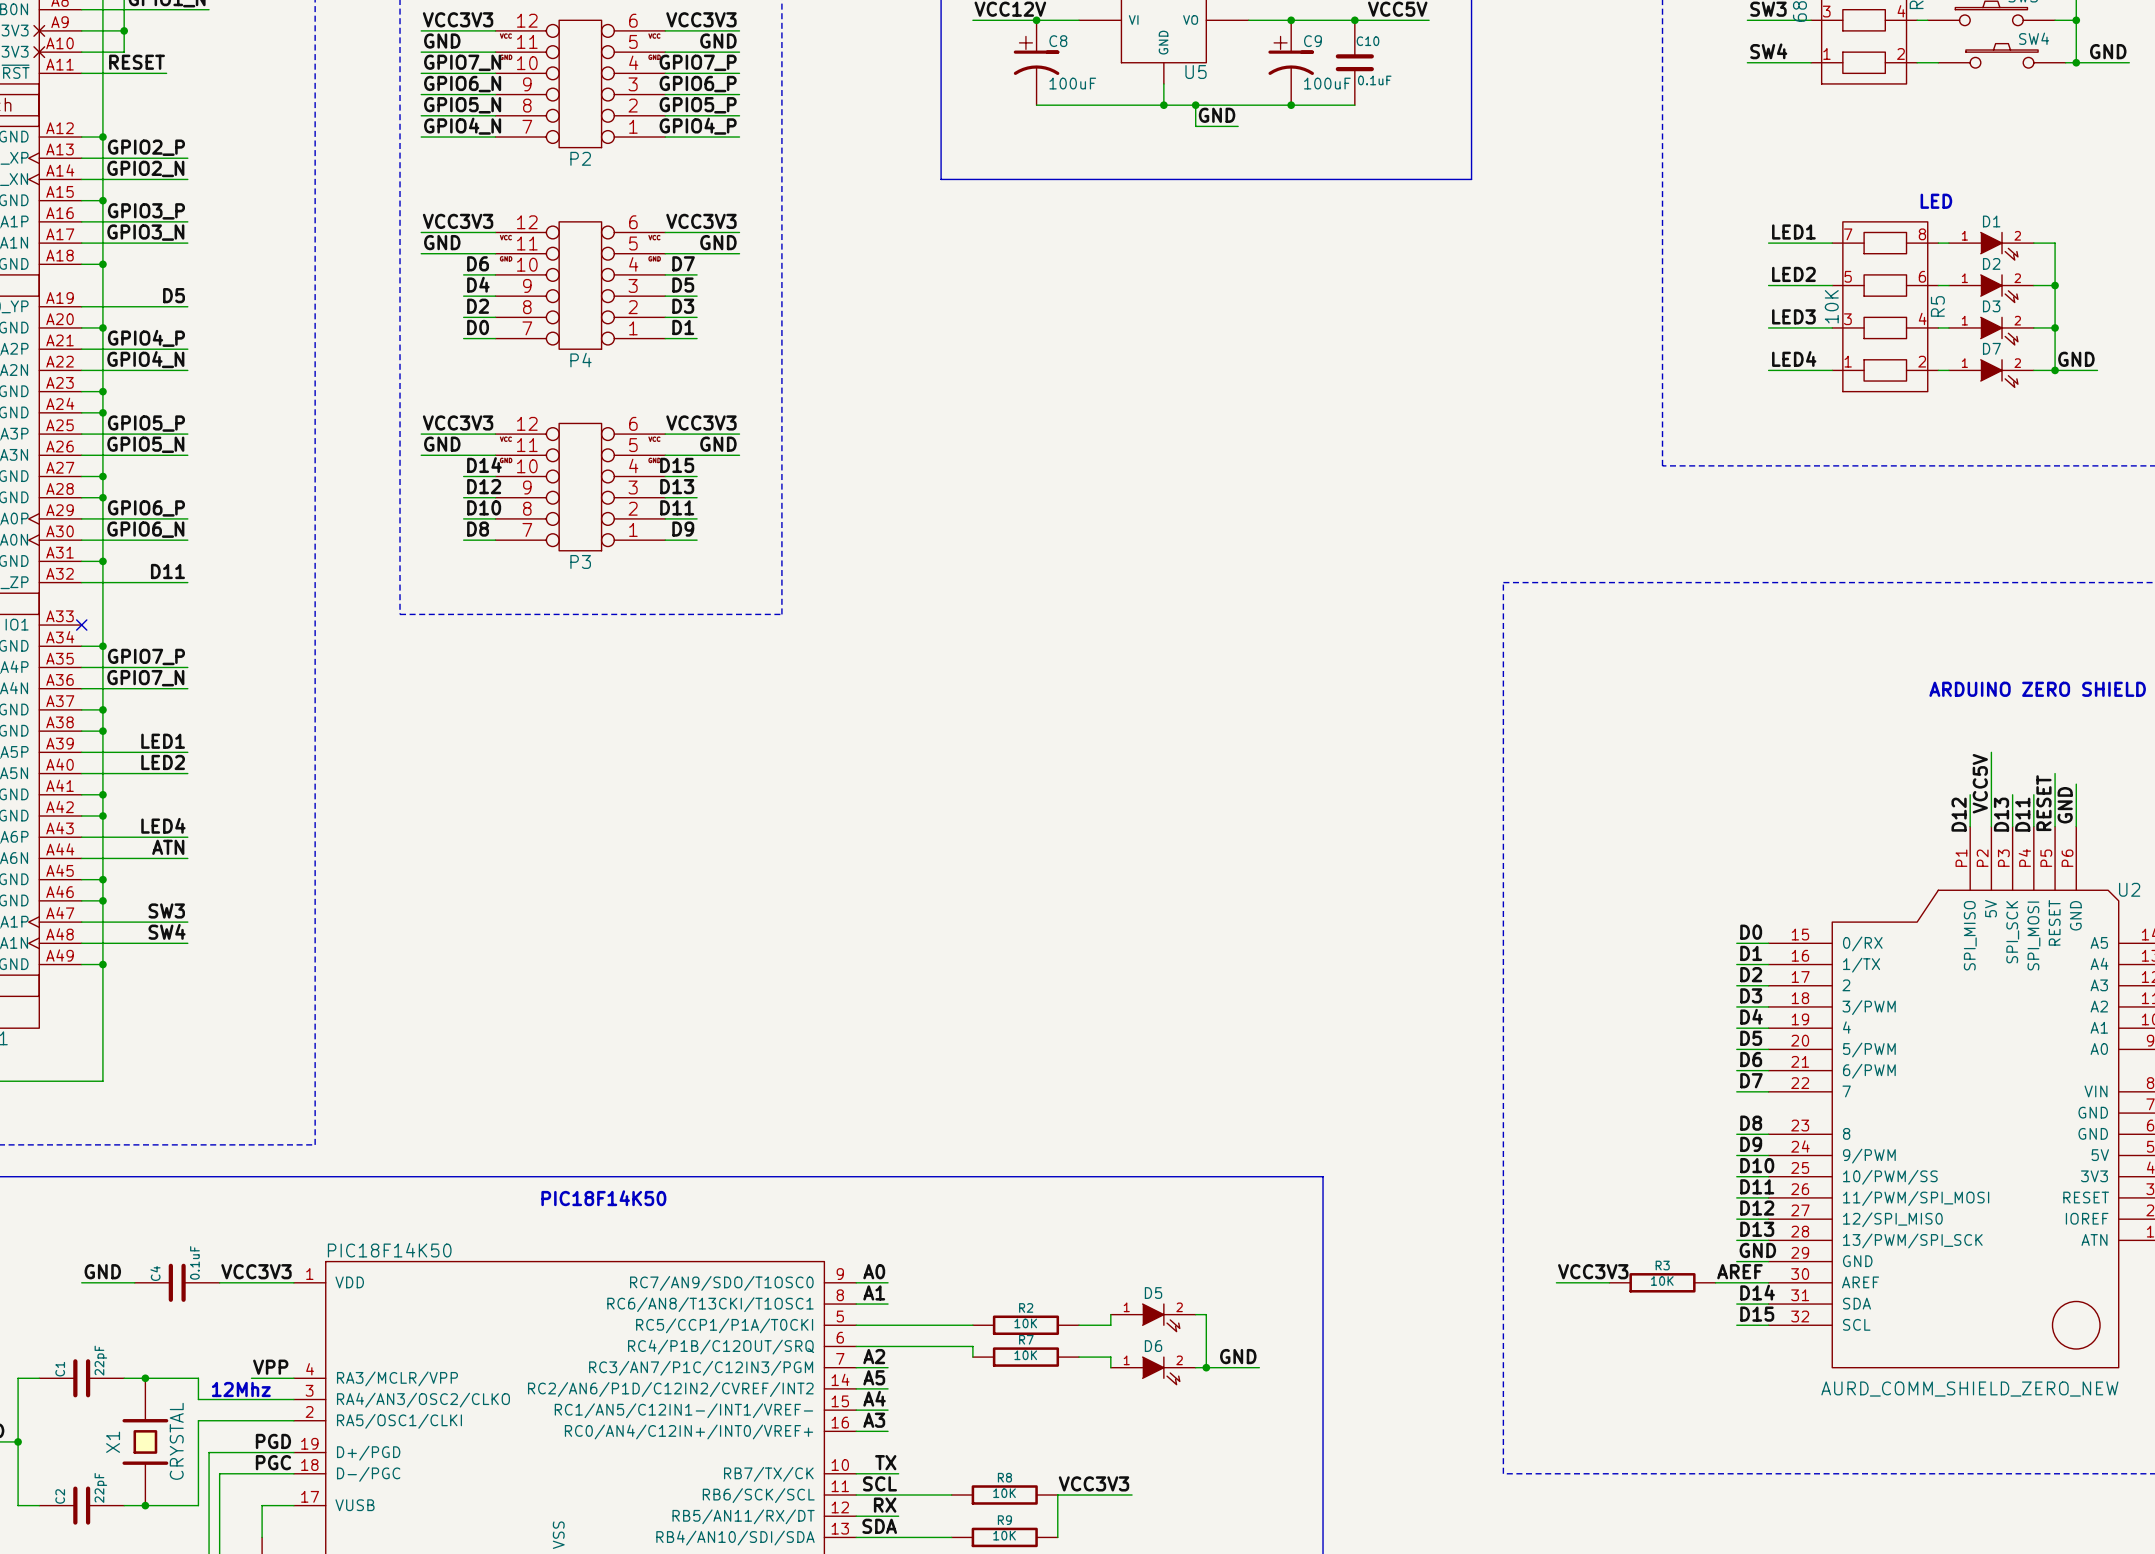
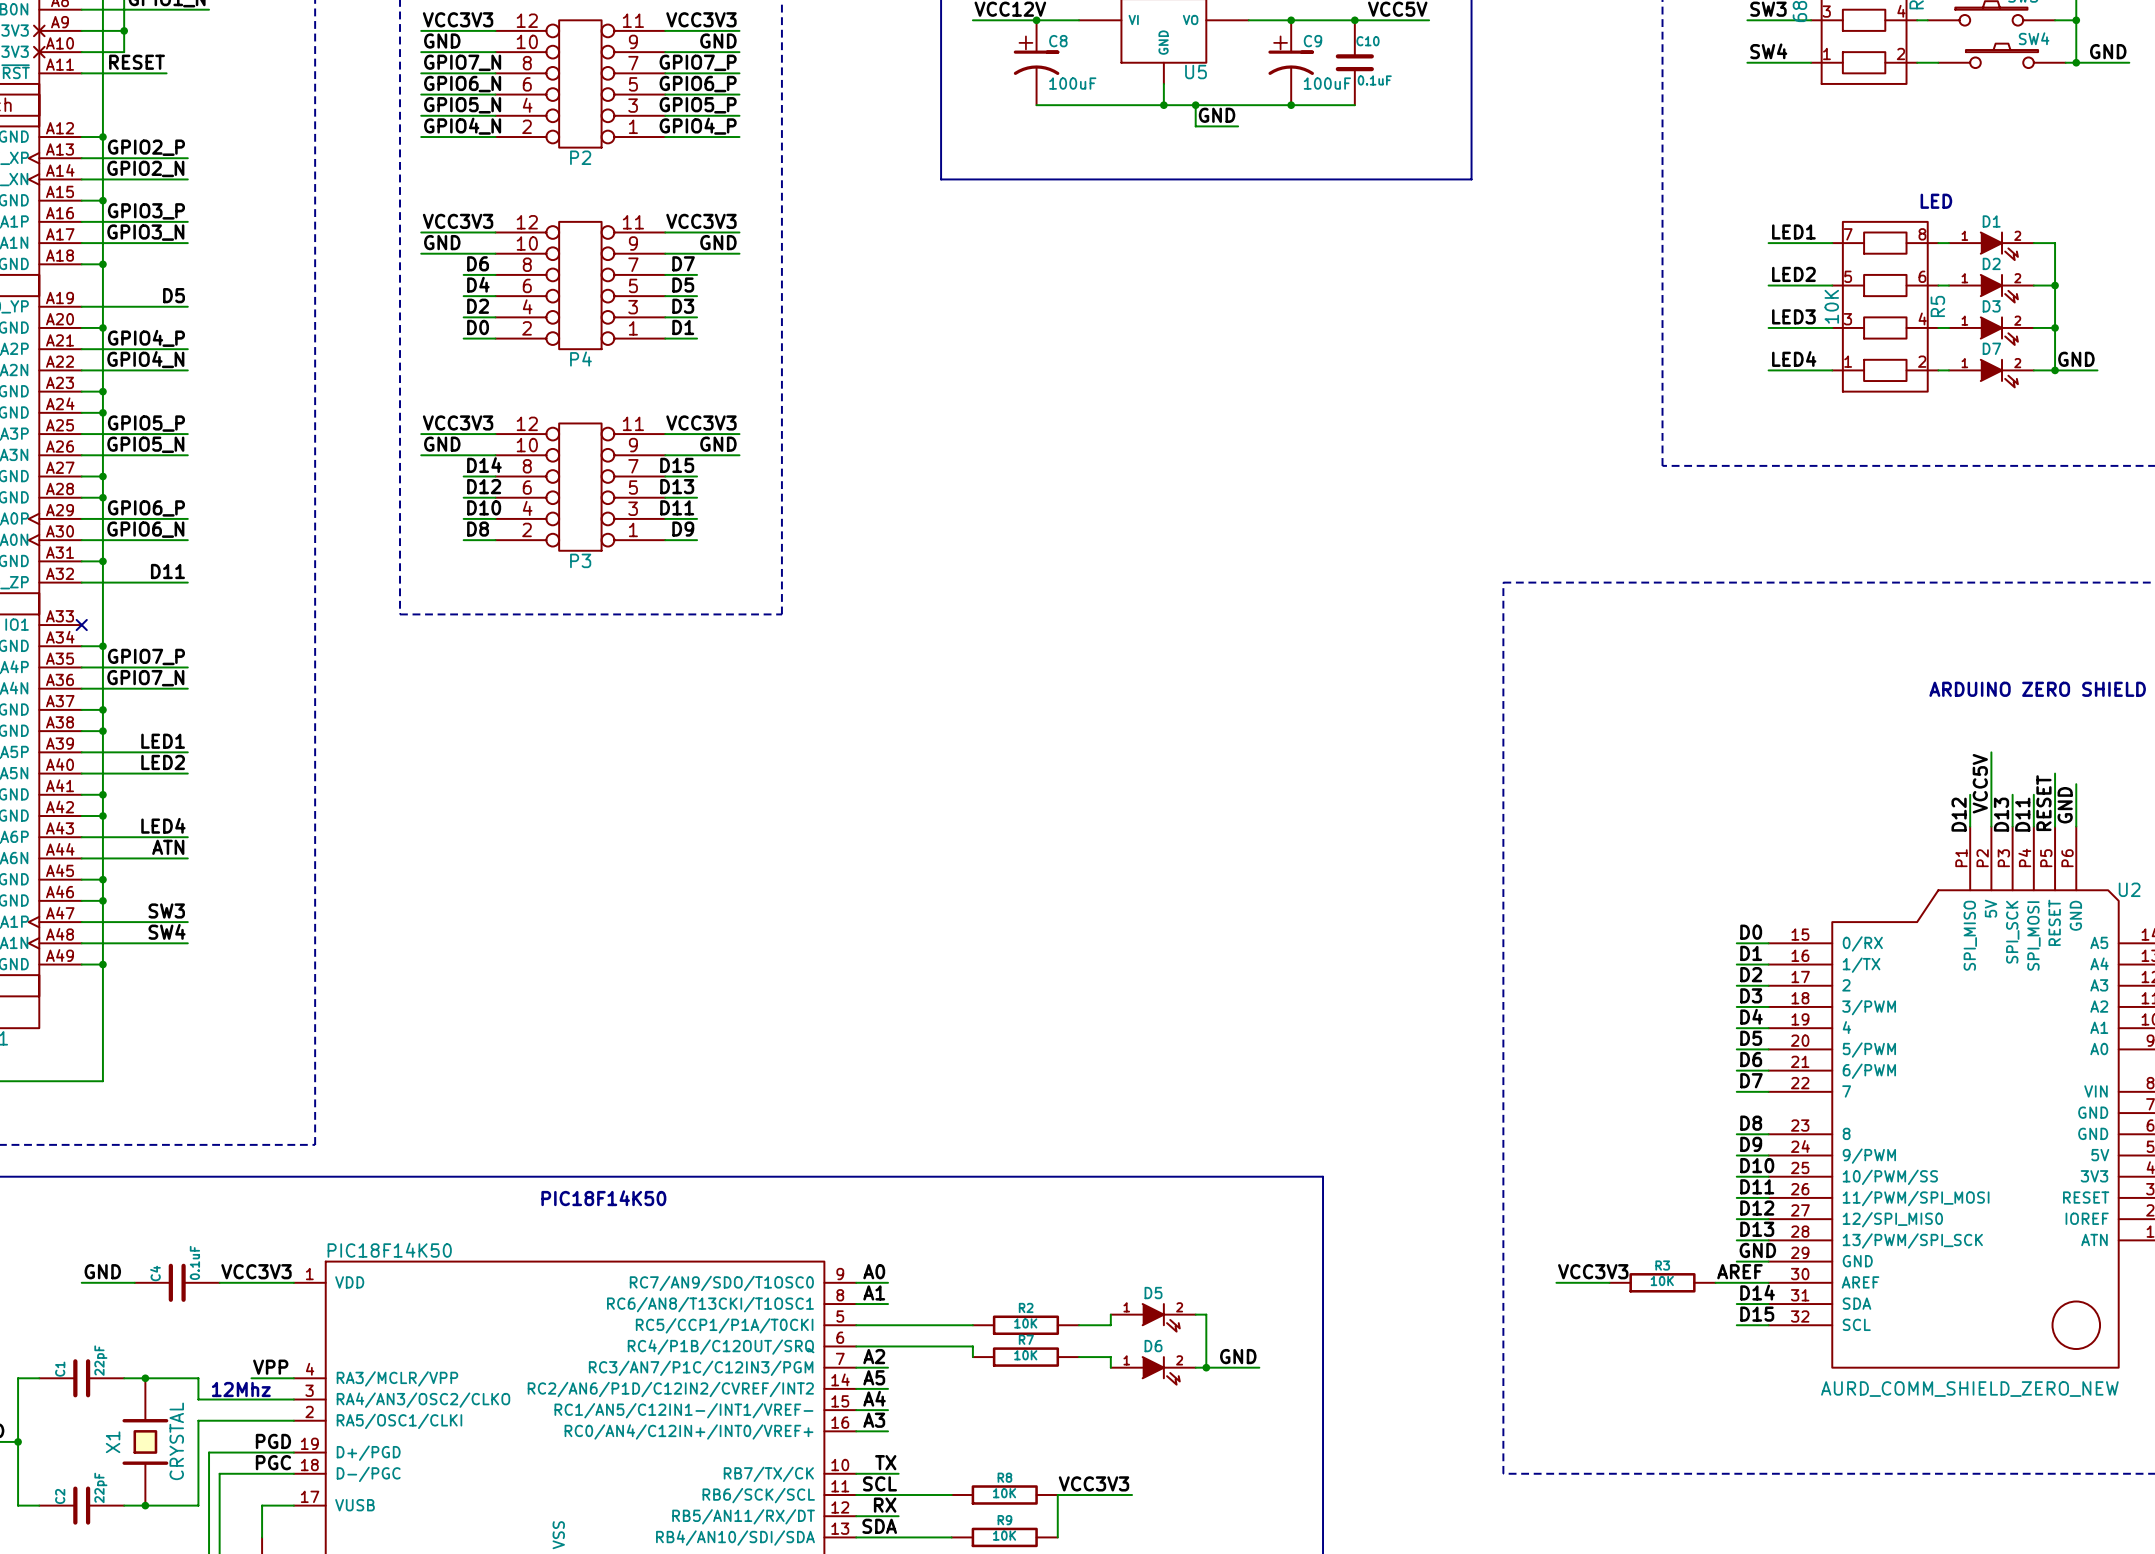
P2 symbol: [495, 20, 666, 148] -> [495, 20, 666, 148]
P4 symbol: [495, 221, 666, 350] -> [495, 221, 666, 350]
P3 symbol: [495, 423, 666, 551] -> [495, 423, 666, 551]

